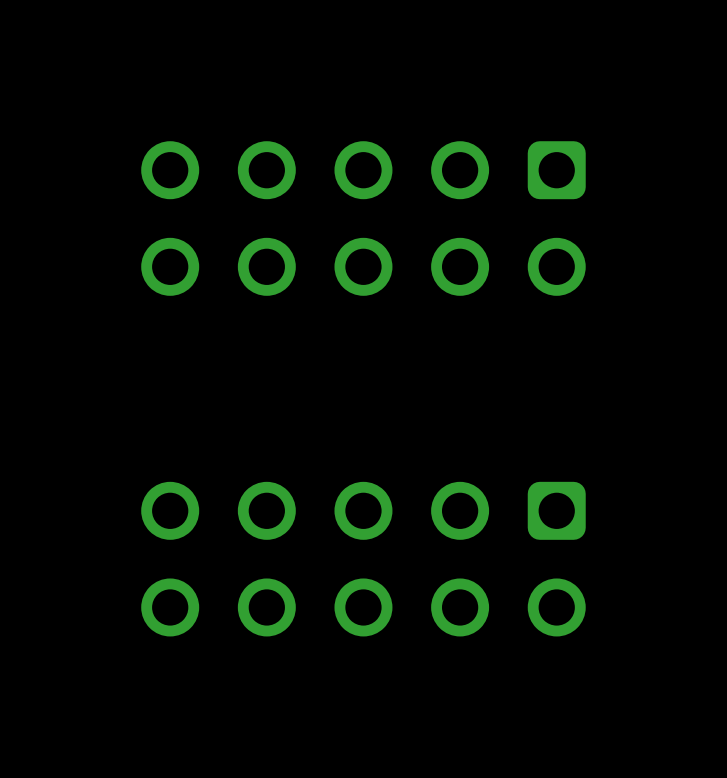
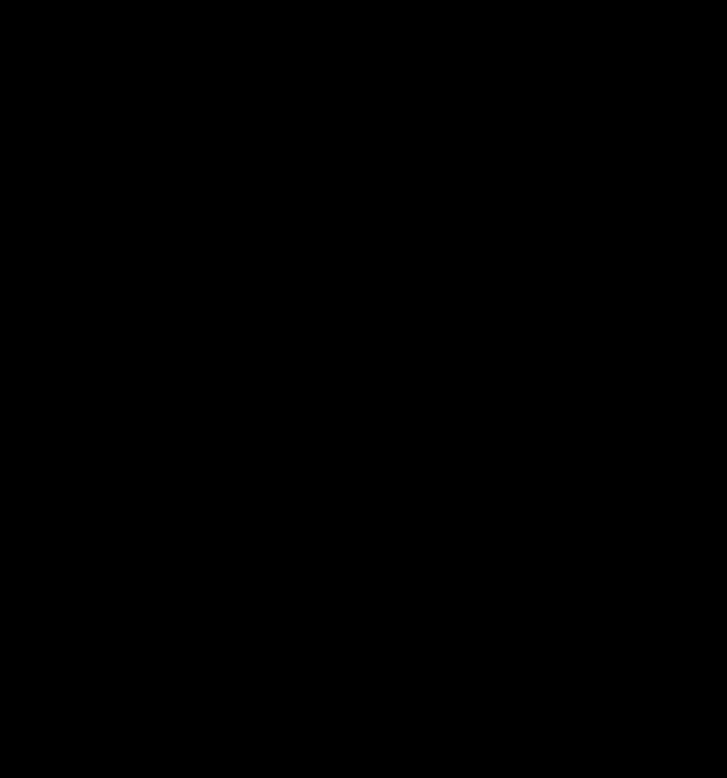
part: (363, 218) -> none
part: (363, 559) -> none

